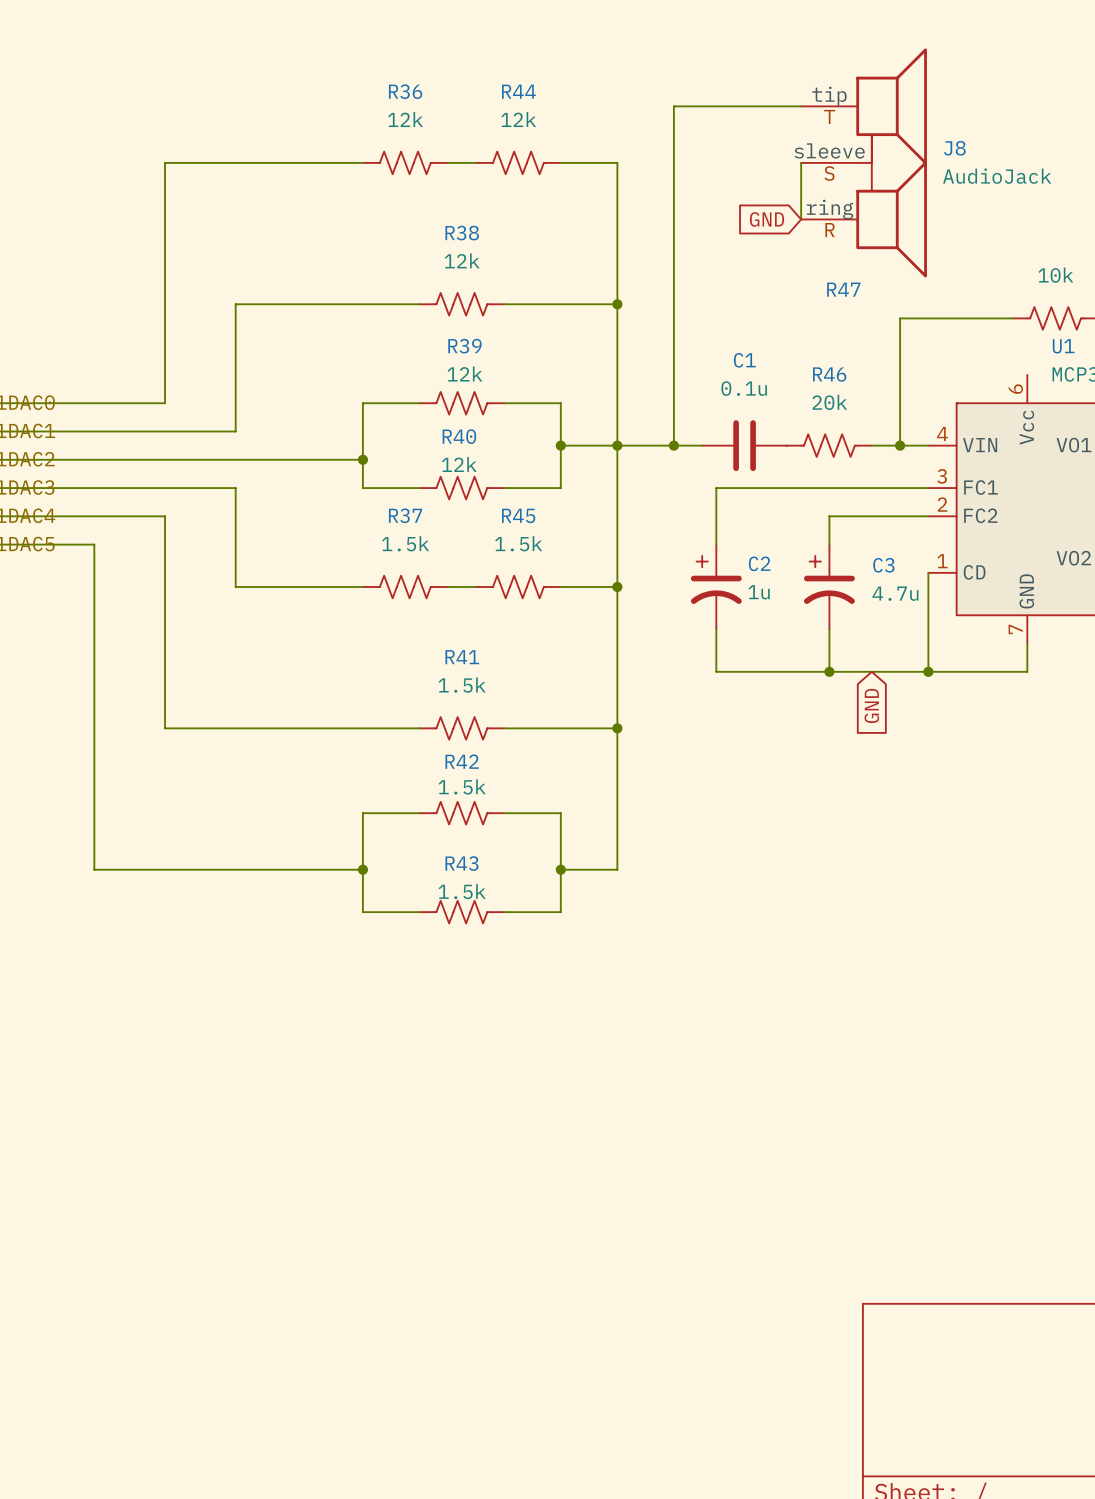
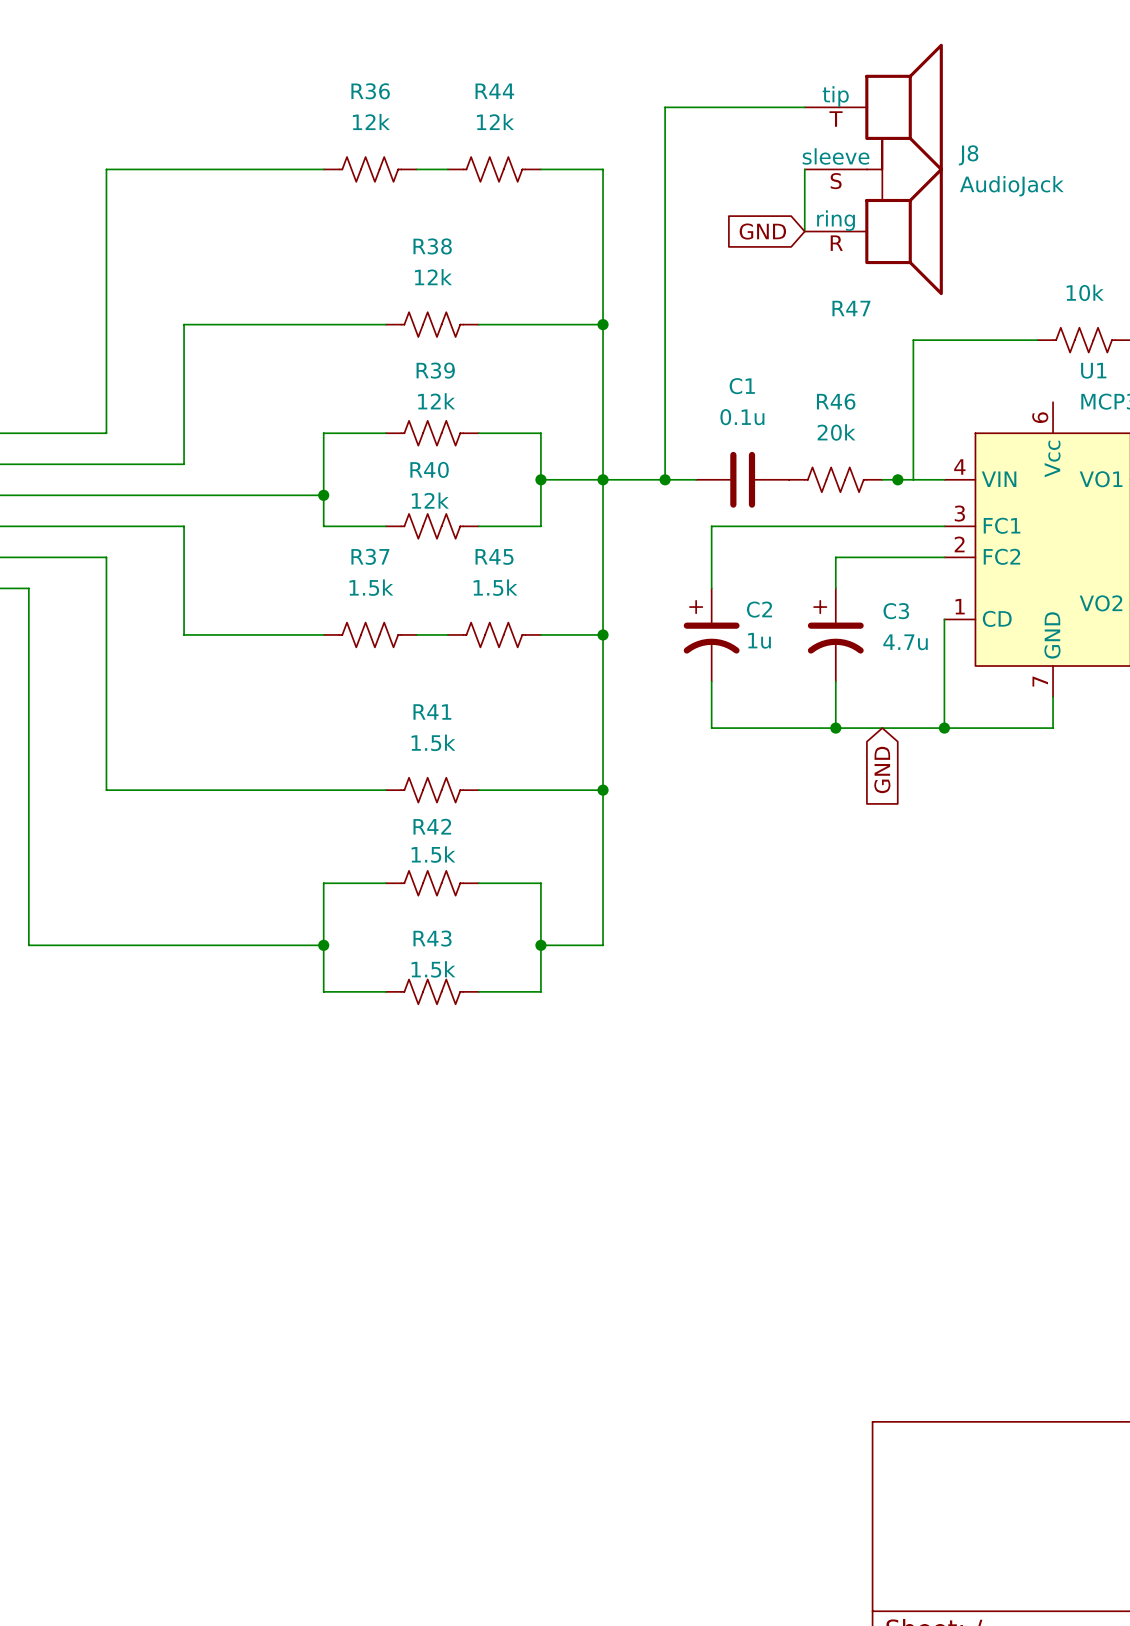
junction position: (900, 445) -> (897, 479)

